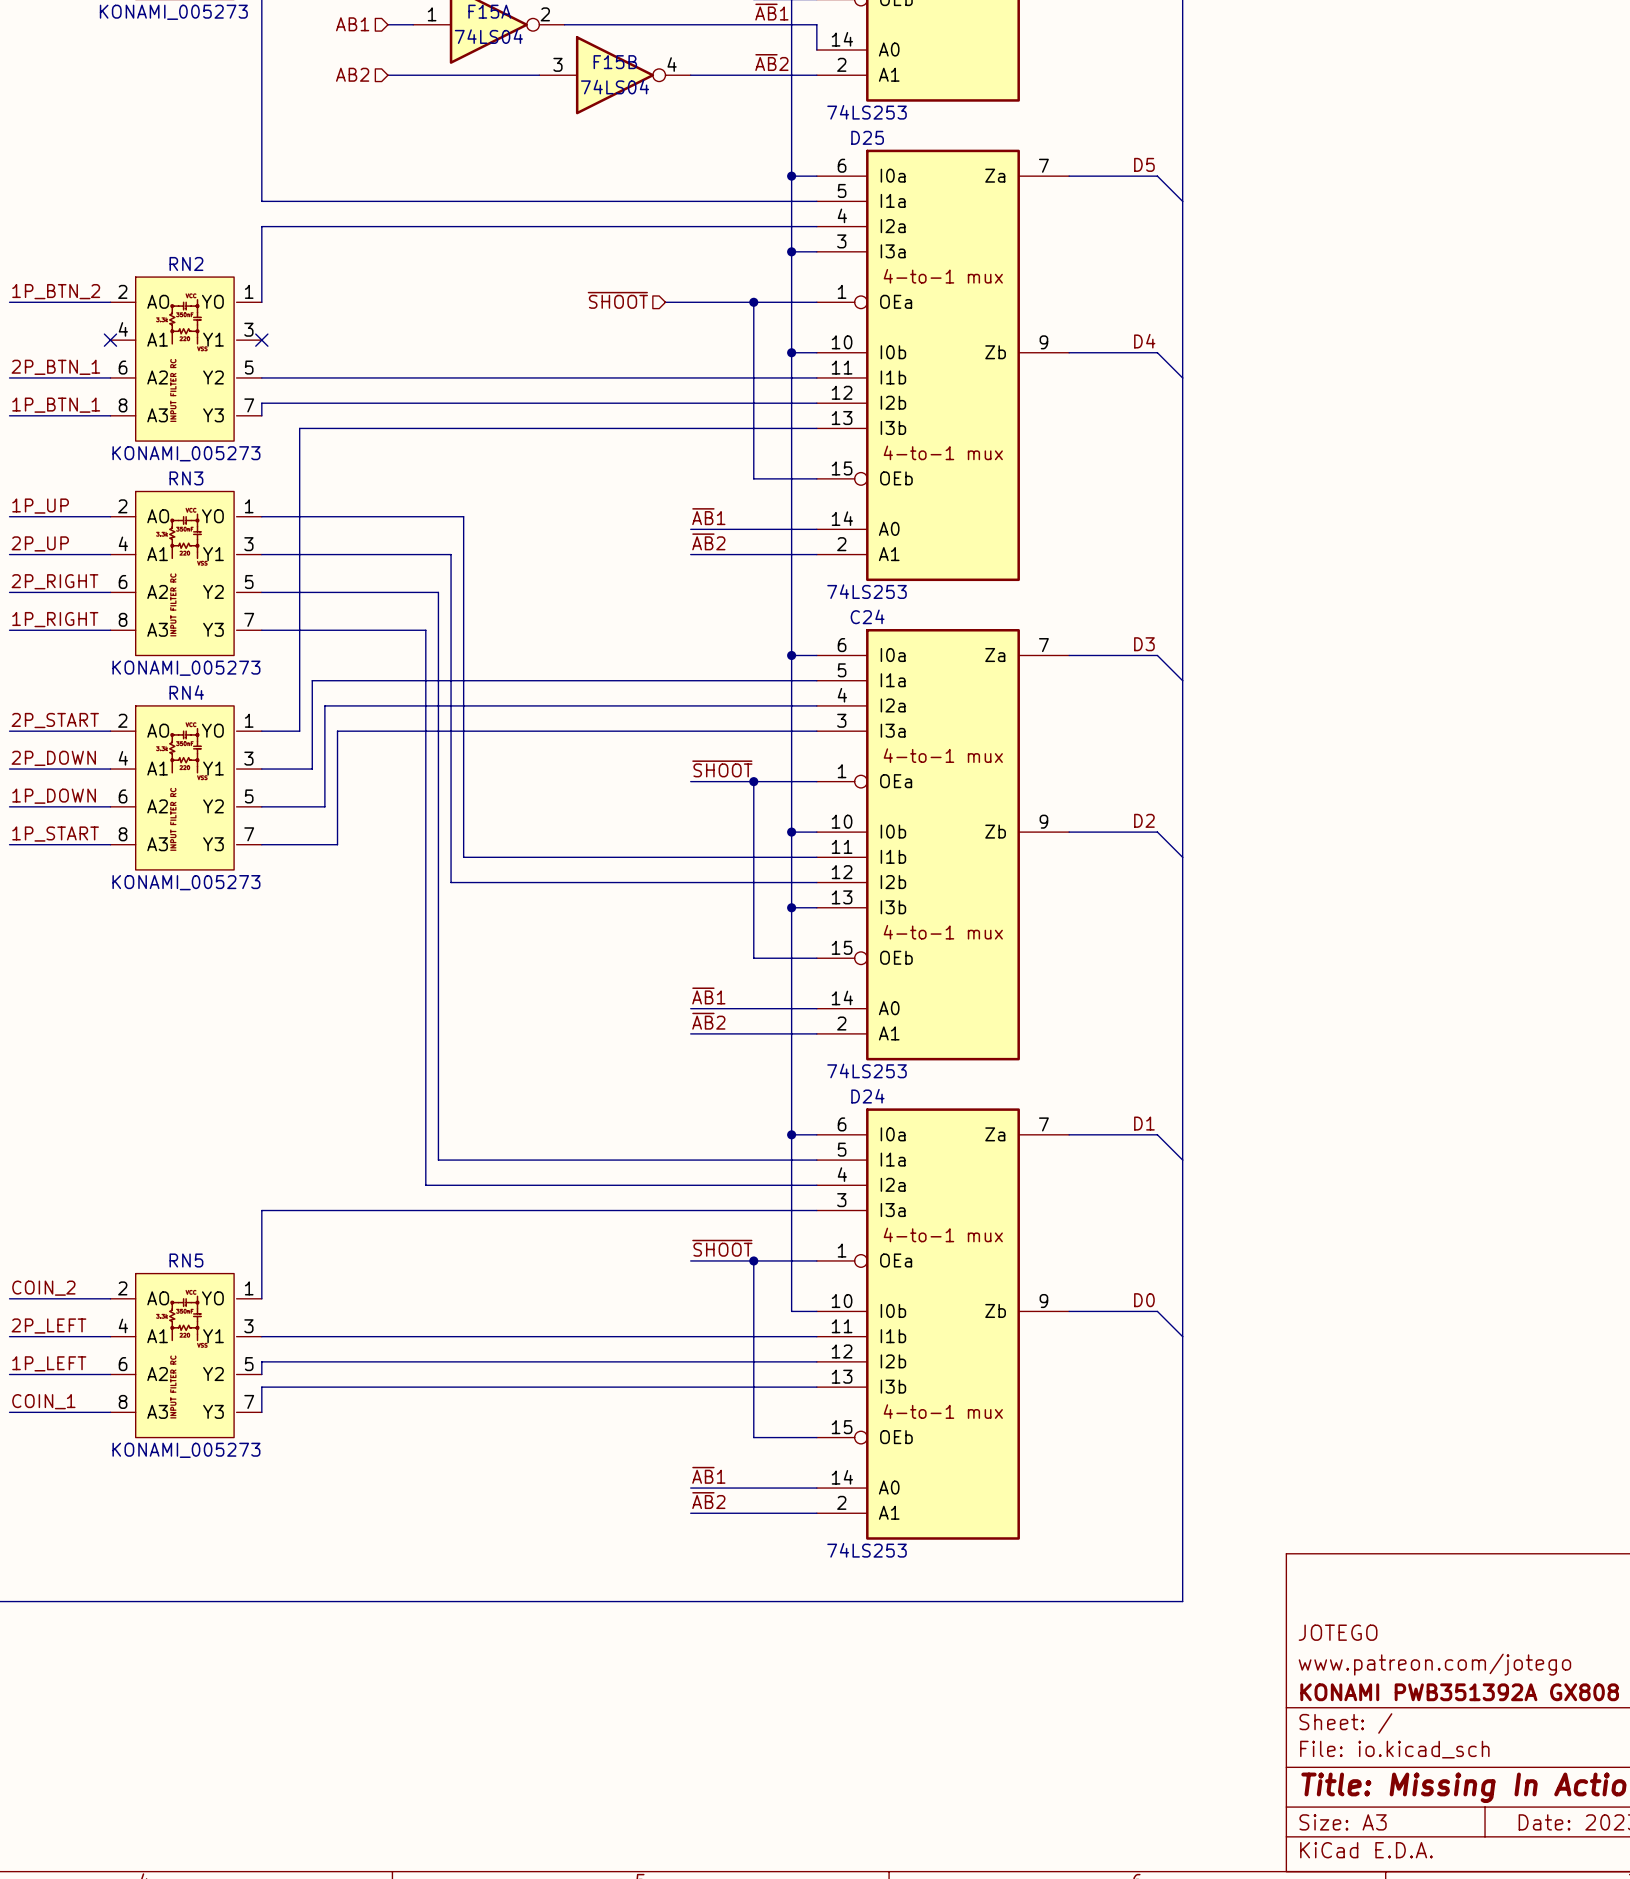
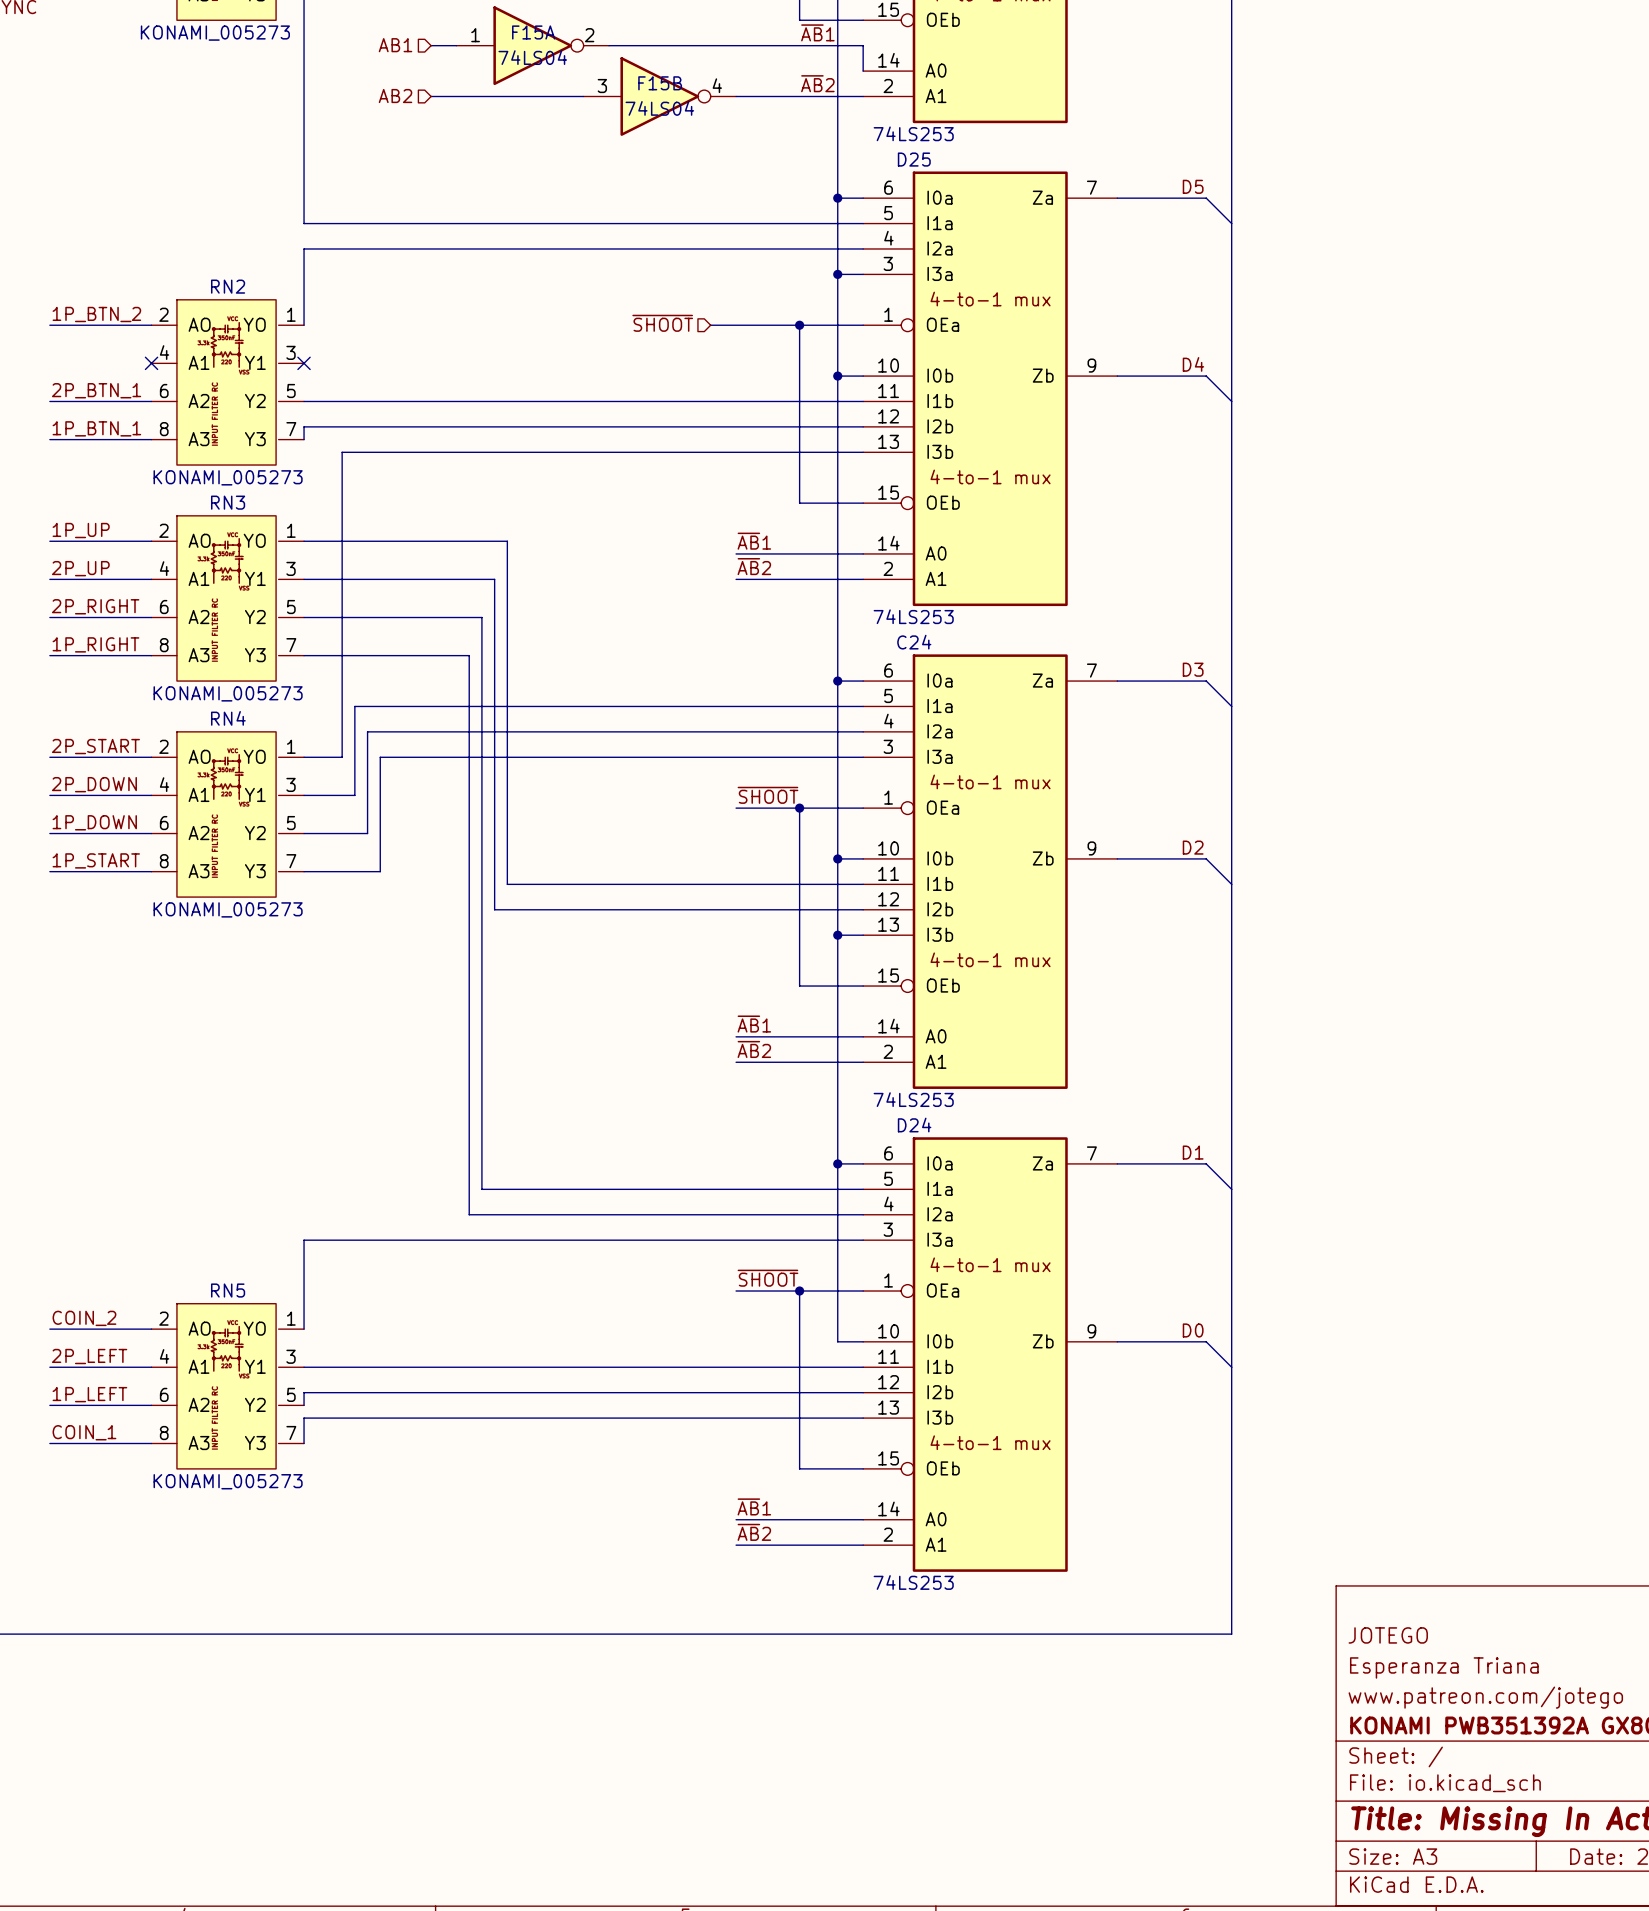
title block: none -> JOTEGO (1388, 1635)
title block: JOTEGO (1338, 1632) -> Esperanza Triana (1444, 1667)

